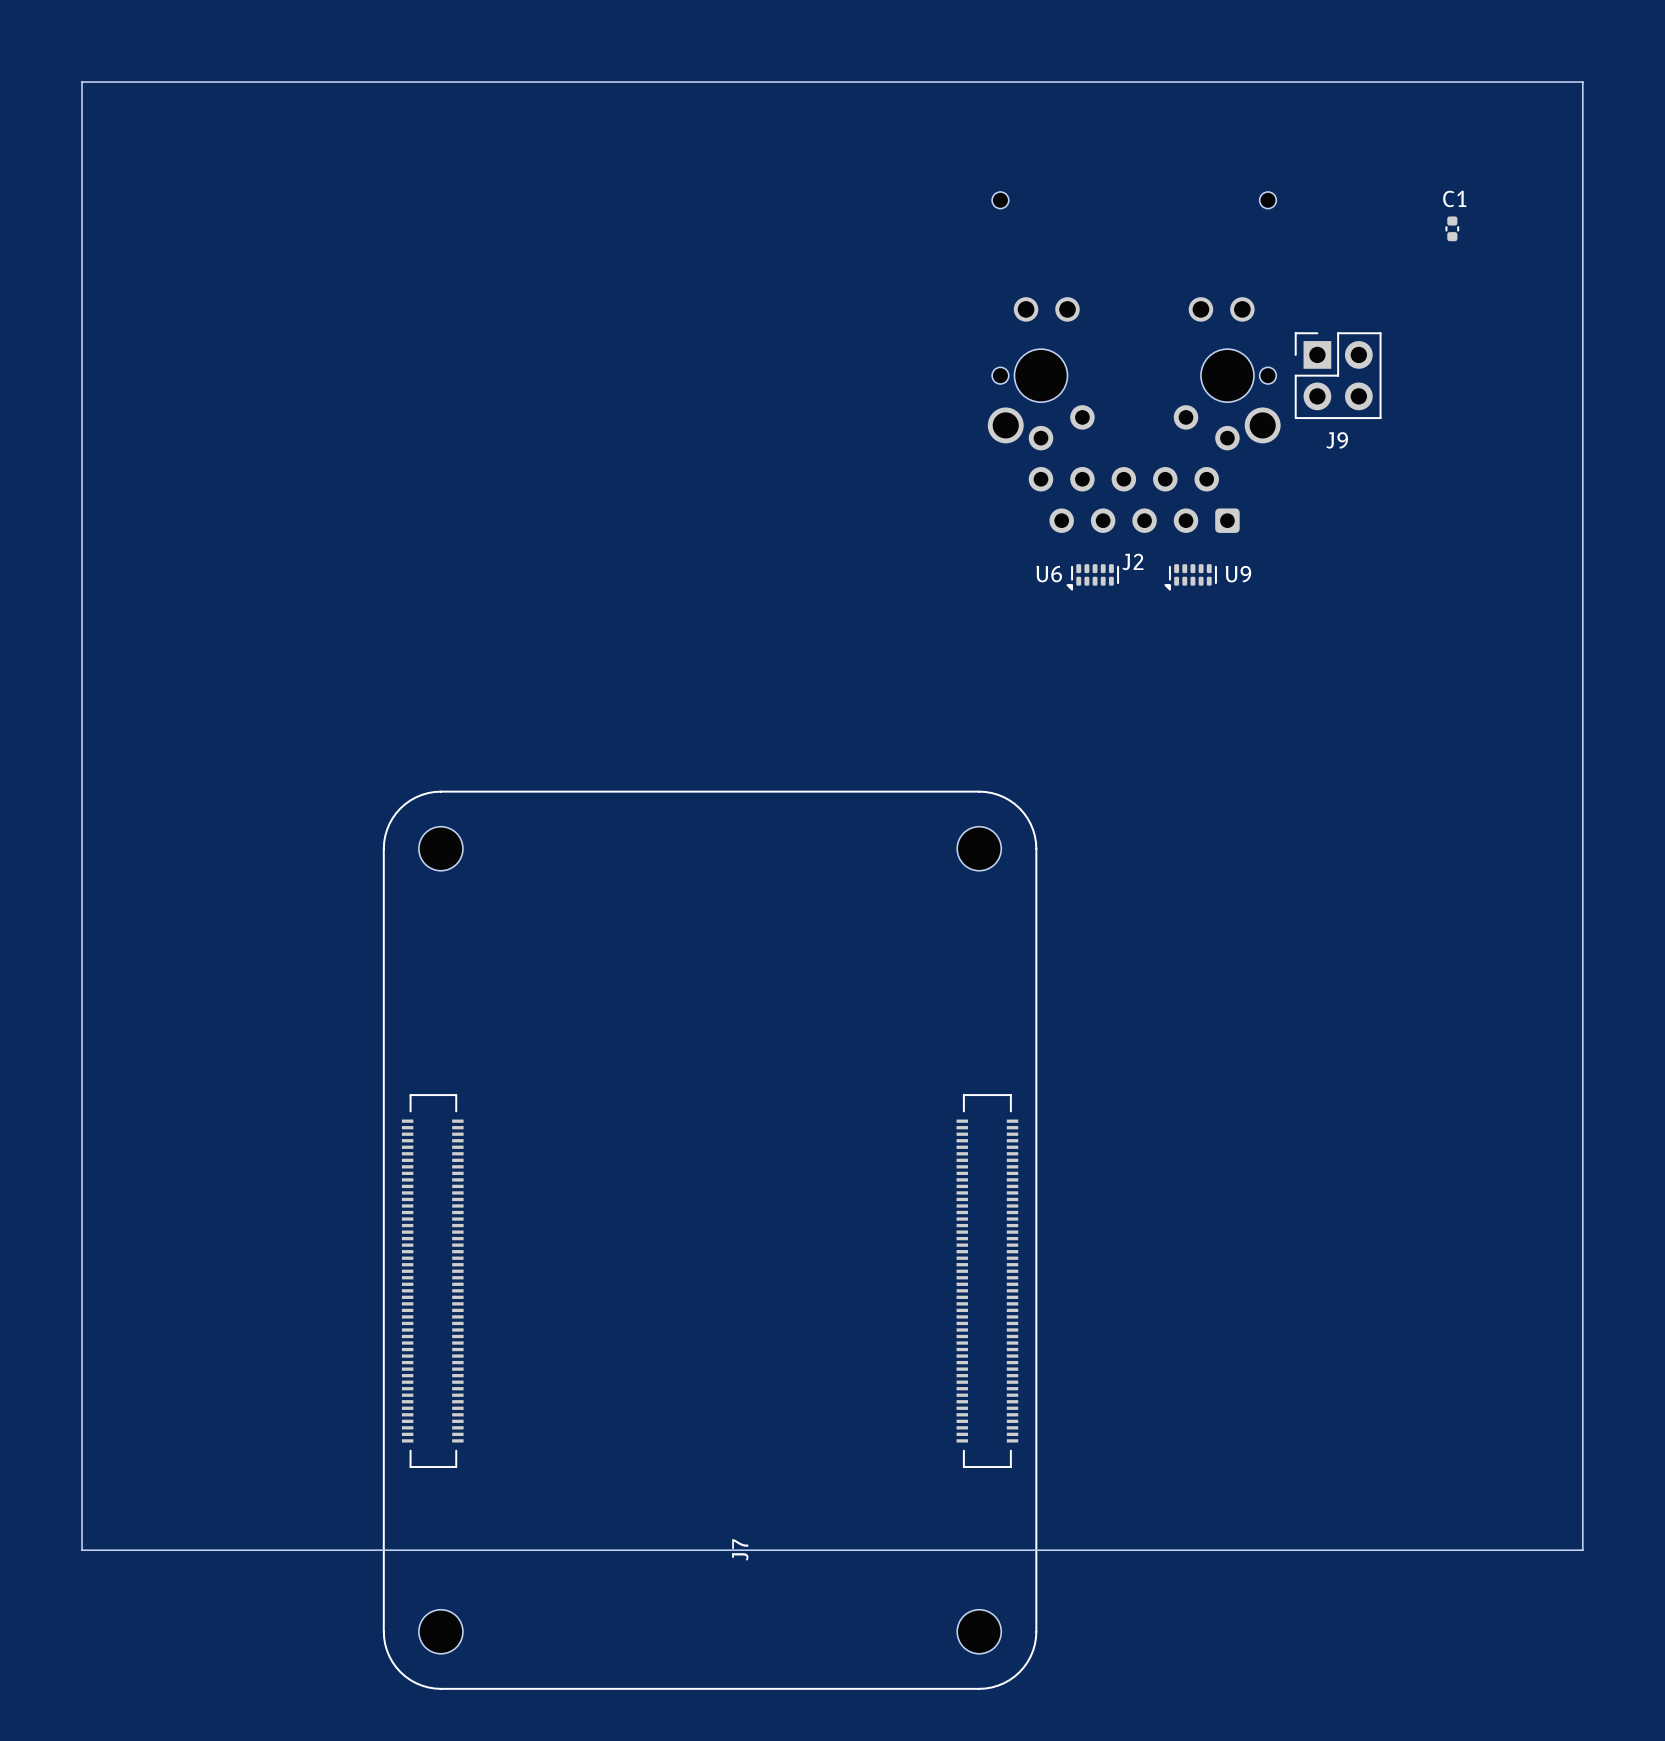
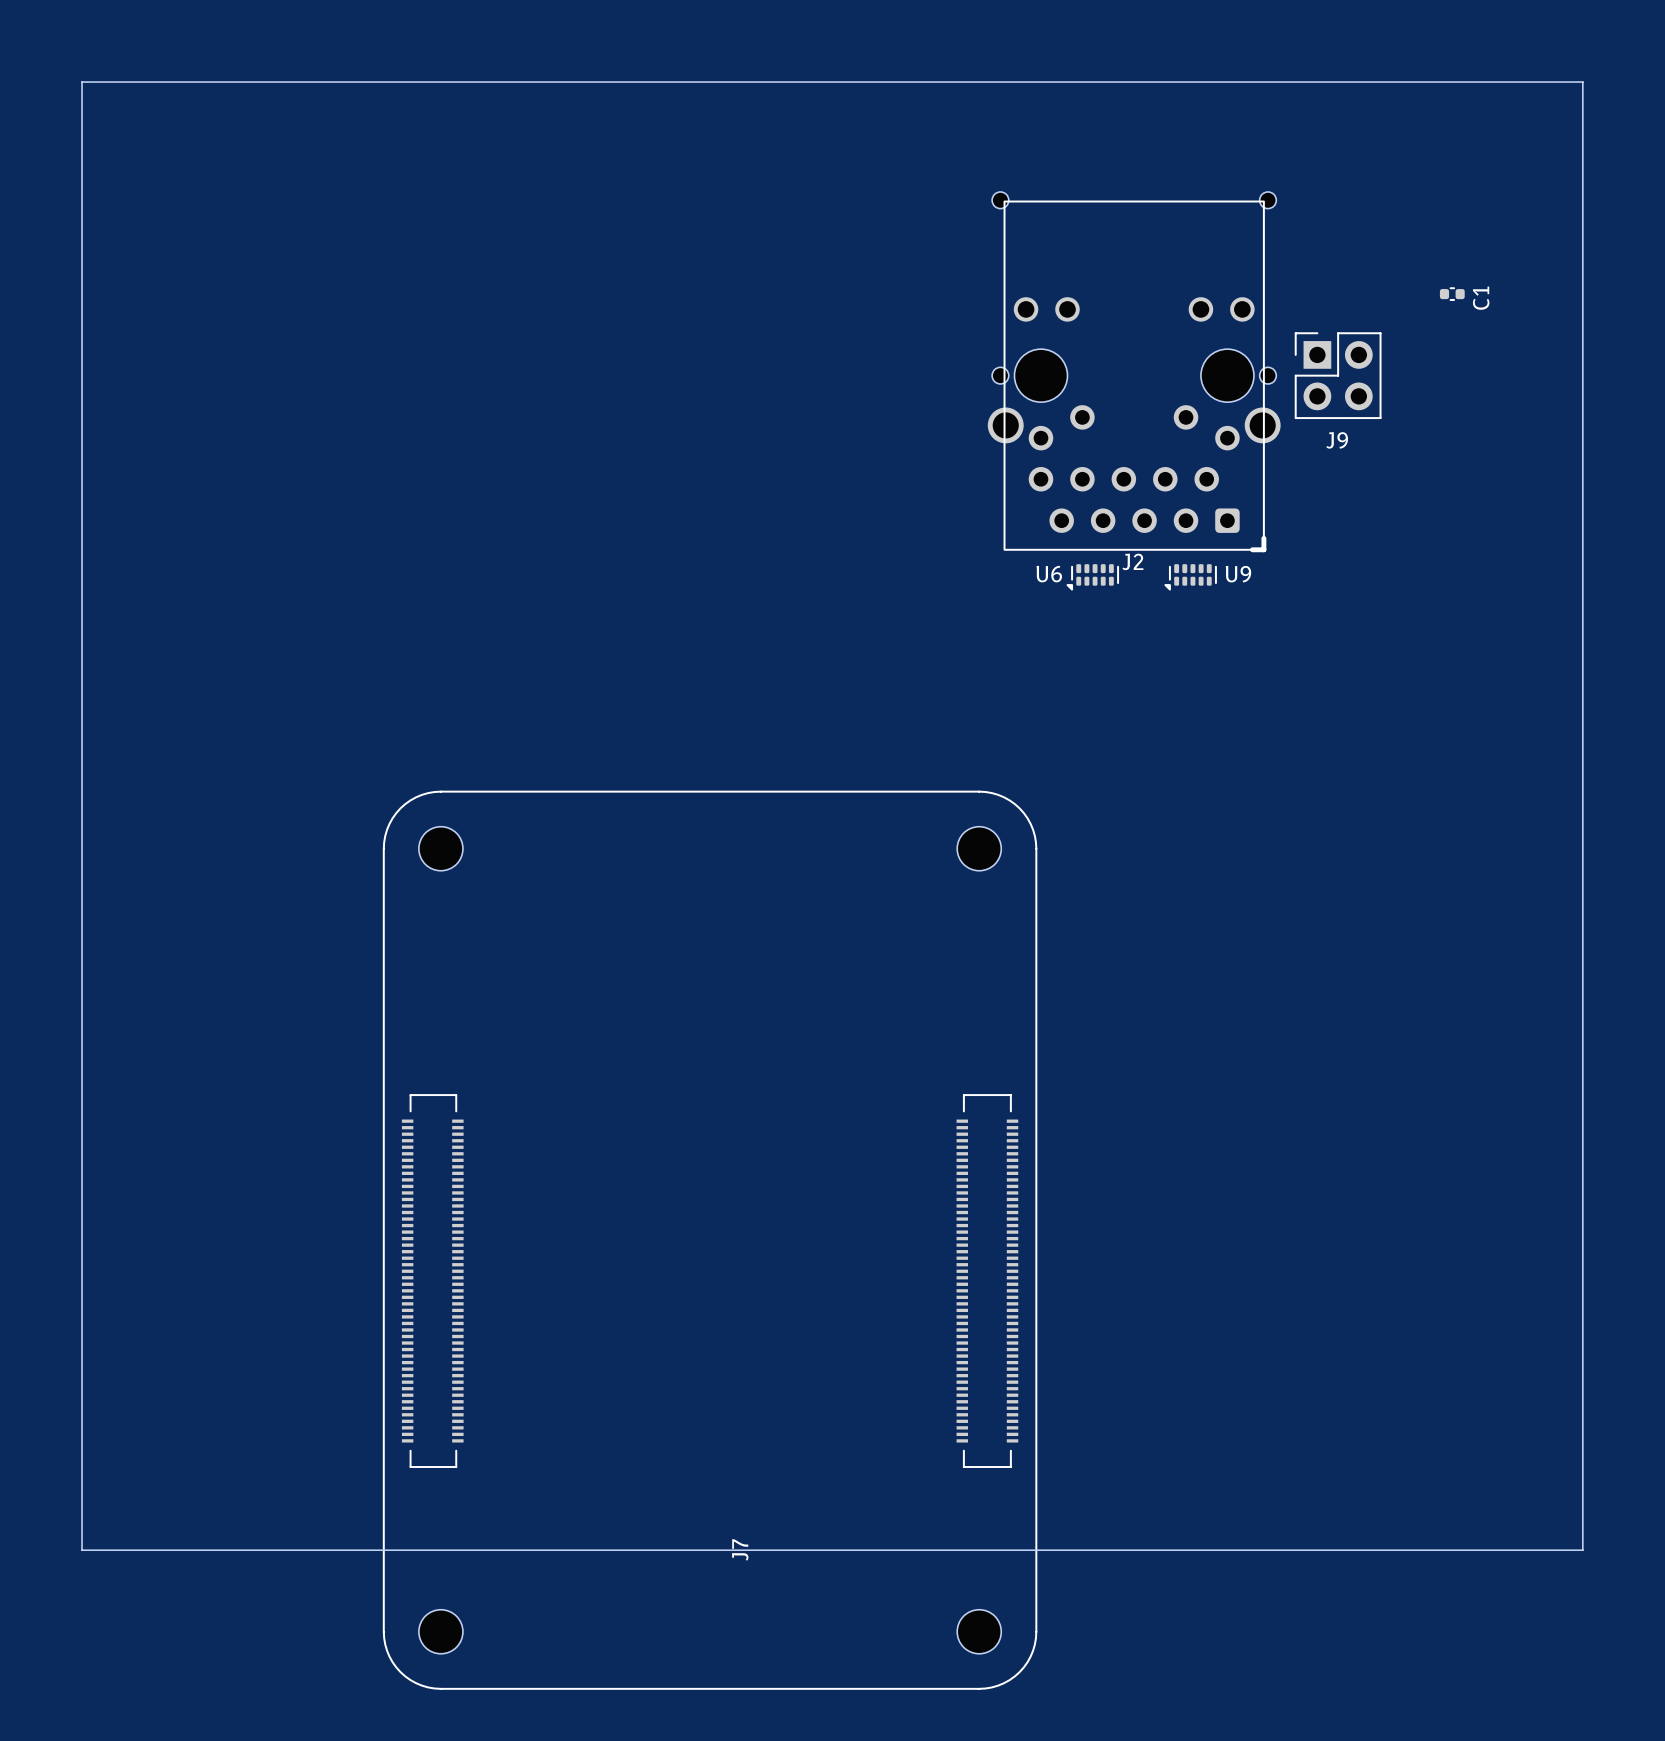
J2 footprint: [987, 191, 1281, 533] -> [987, 191, 1281, 553]
C1 rotation: 0° (1452, 228) -> 90° clockwise (1452, 294)
C1 position: (1452, 228) -> (1452, 294)

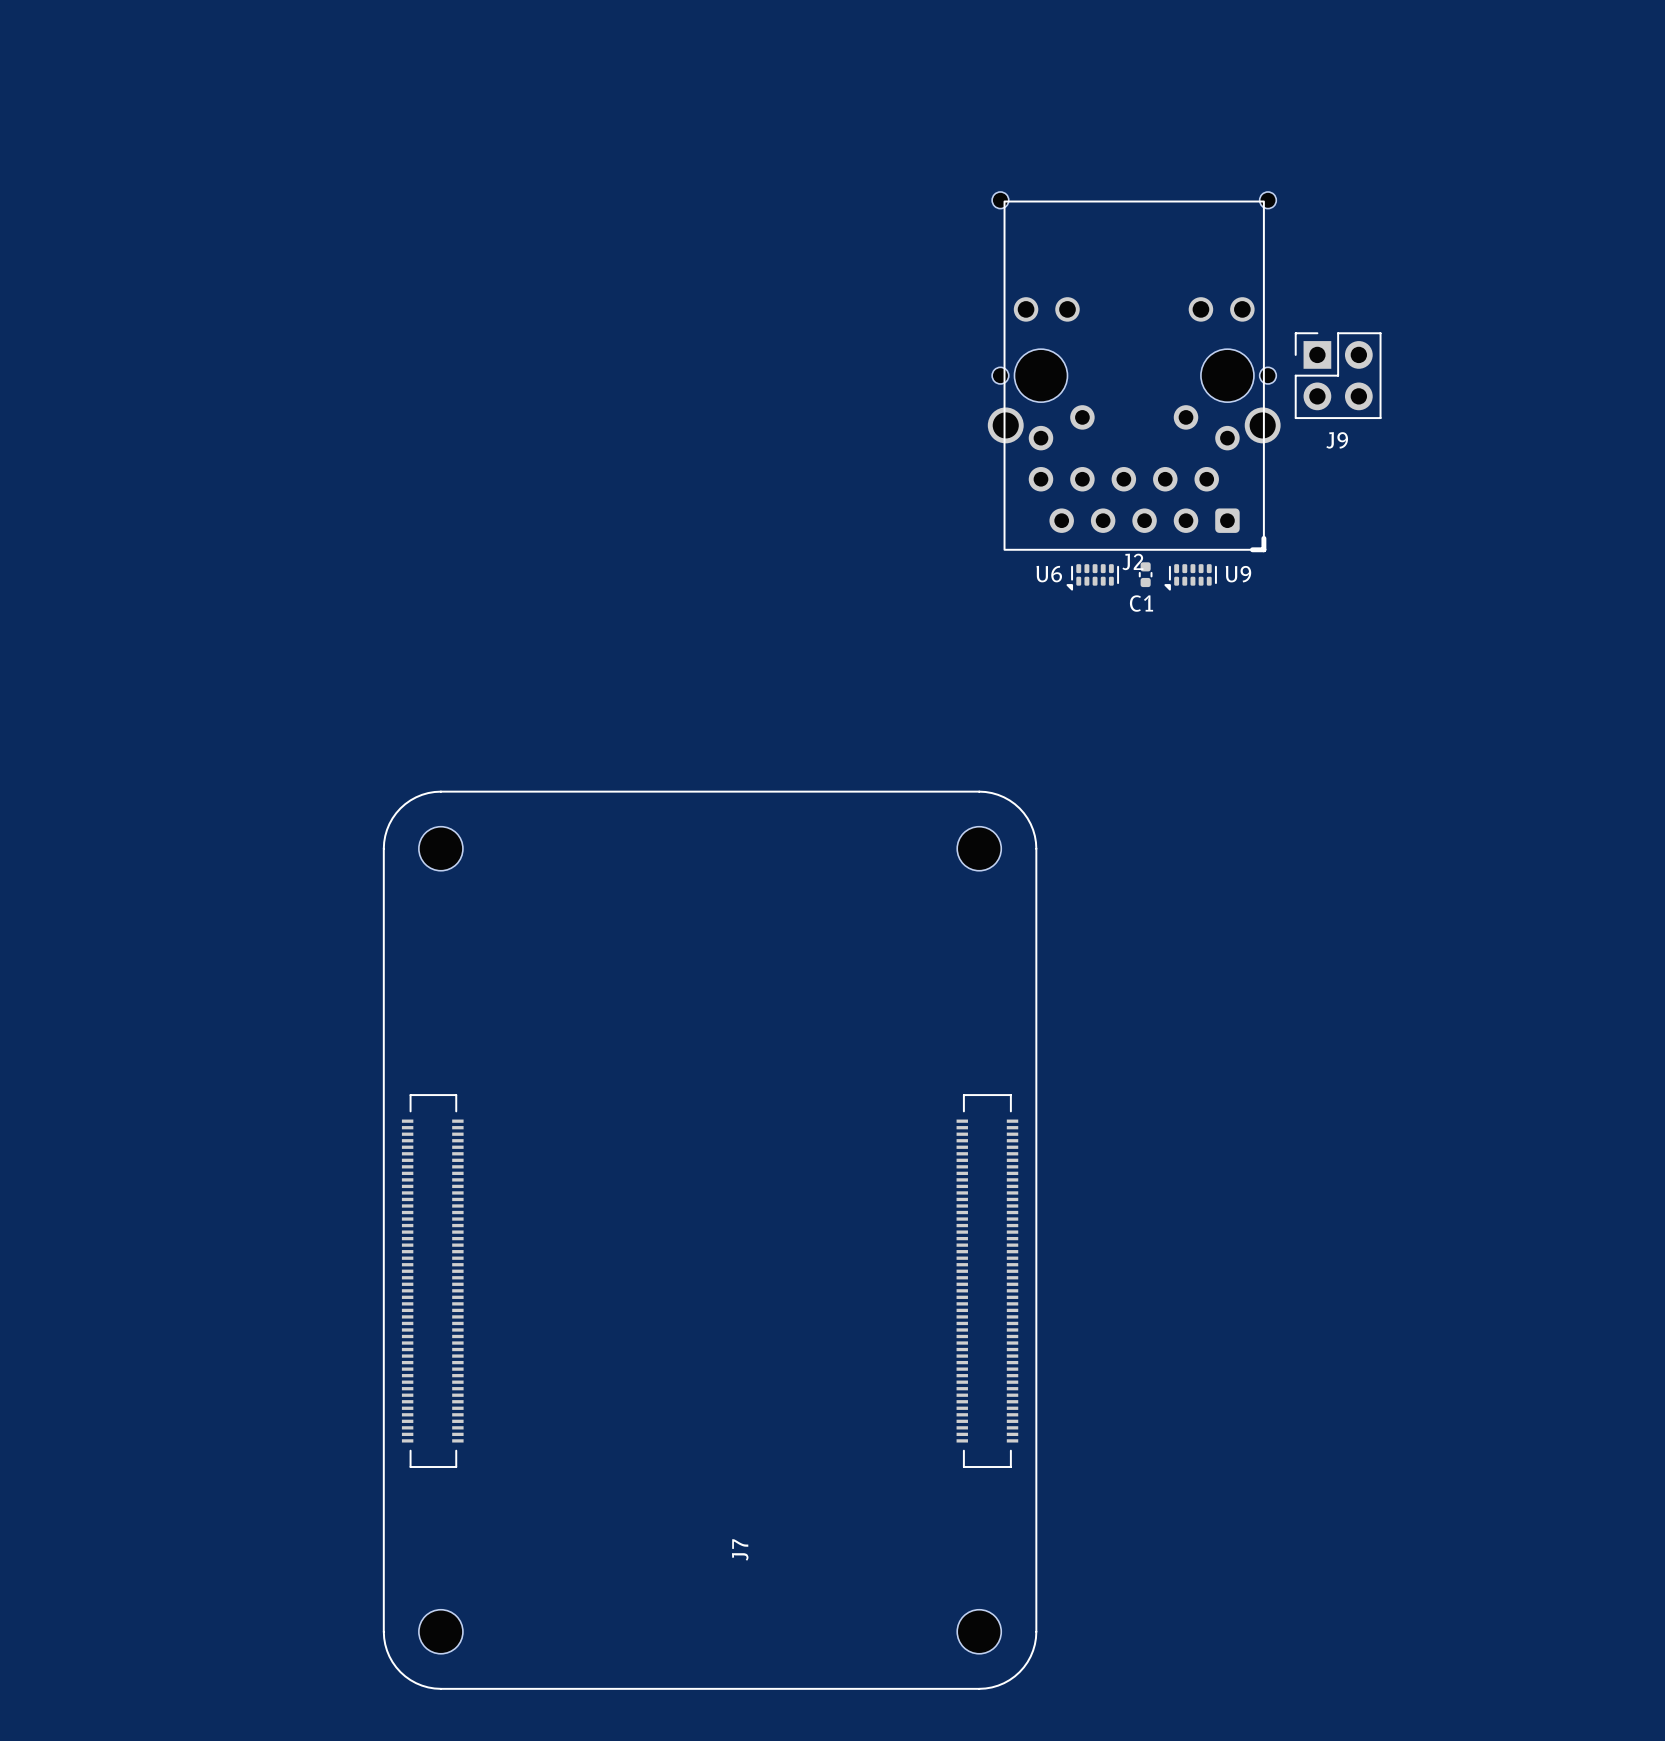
board edge: (82, 82) (1582, 82) (1582, 1550) (82, 1550) (82, 82) -> none
C1 rotation: 0° (1452, 294) -> 90° clockwise (1145, 574)
C1 position: (1452, 294) -> (1145, 574)

